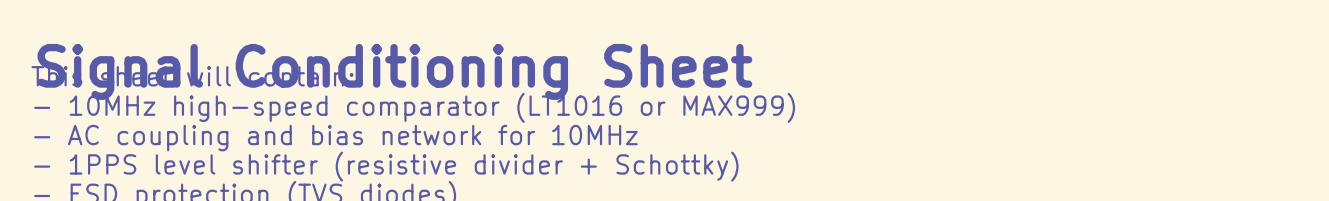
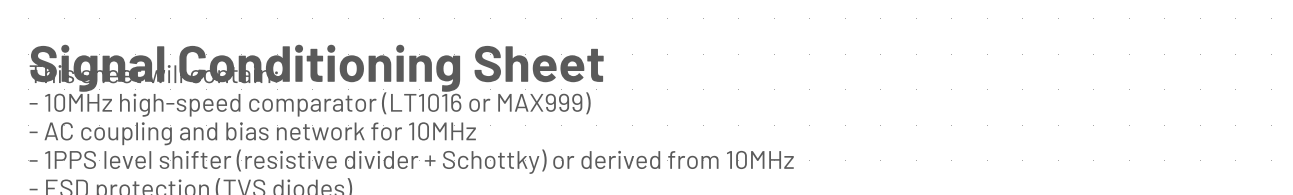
text: - 1PPS level shifter (resistive divider + Schottky) (386, 166) -> - 1PPS level shifter (resistive divider + Schottky) or derived from 10MHz (411, 161)

